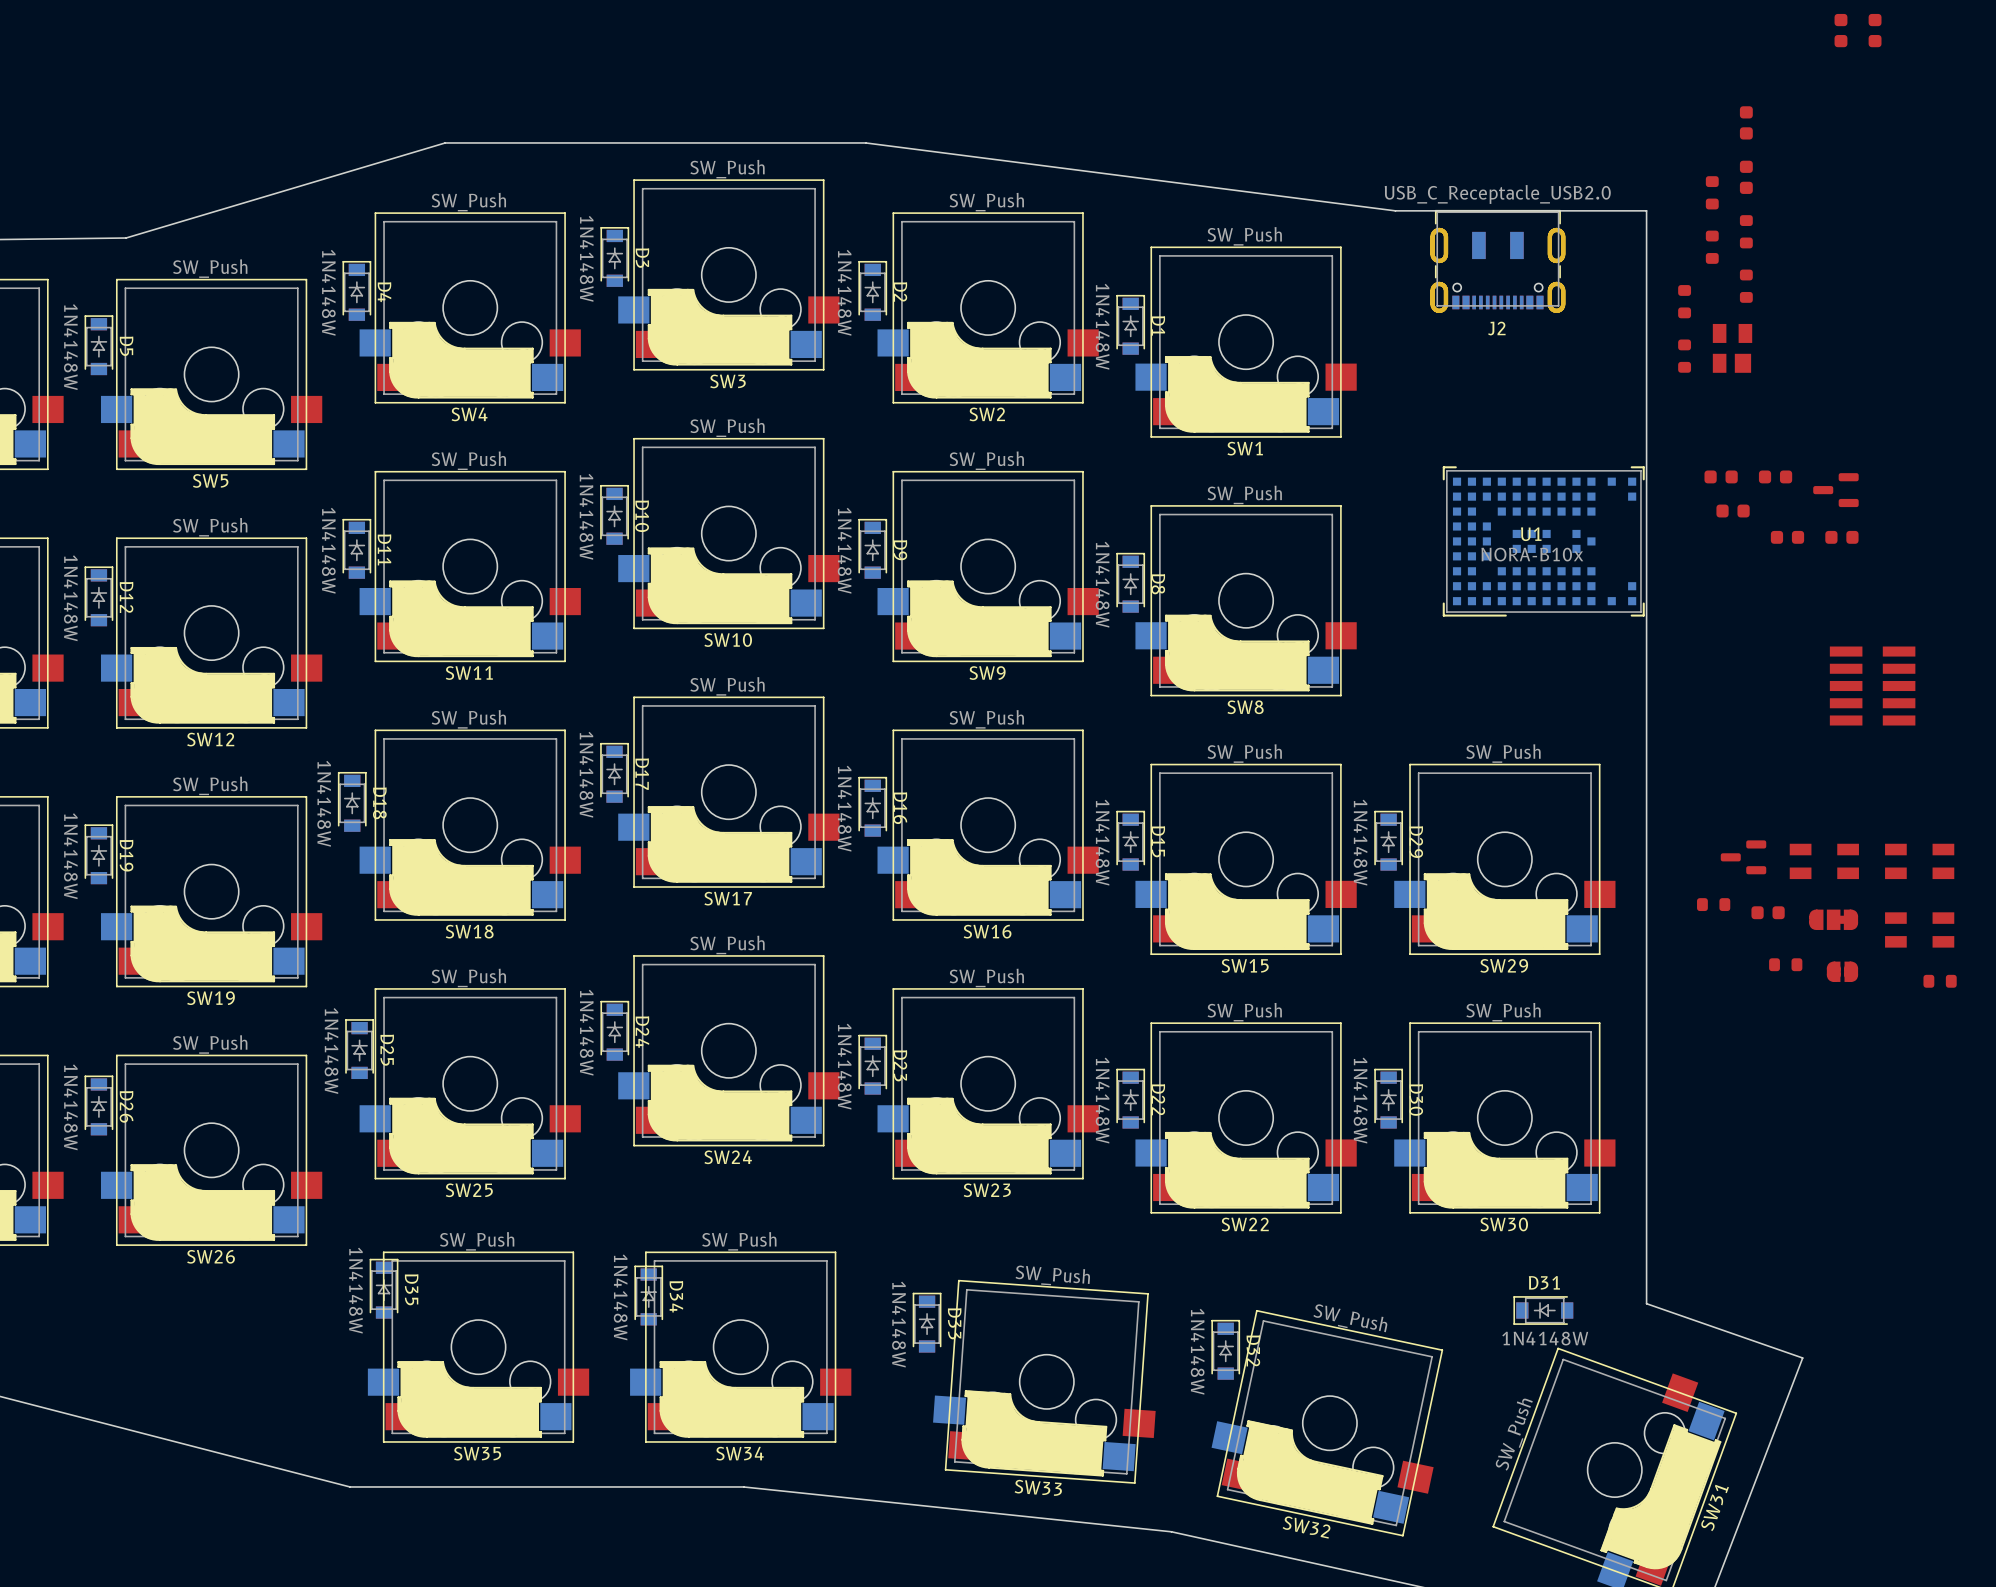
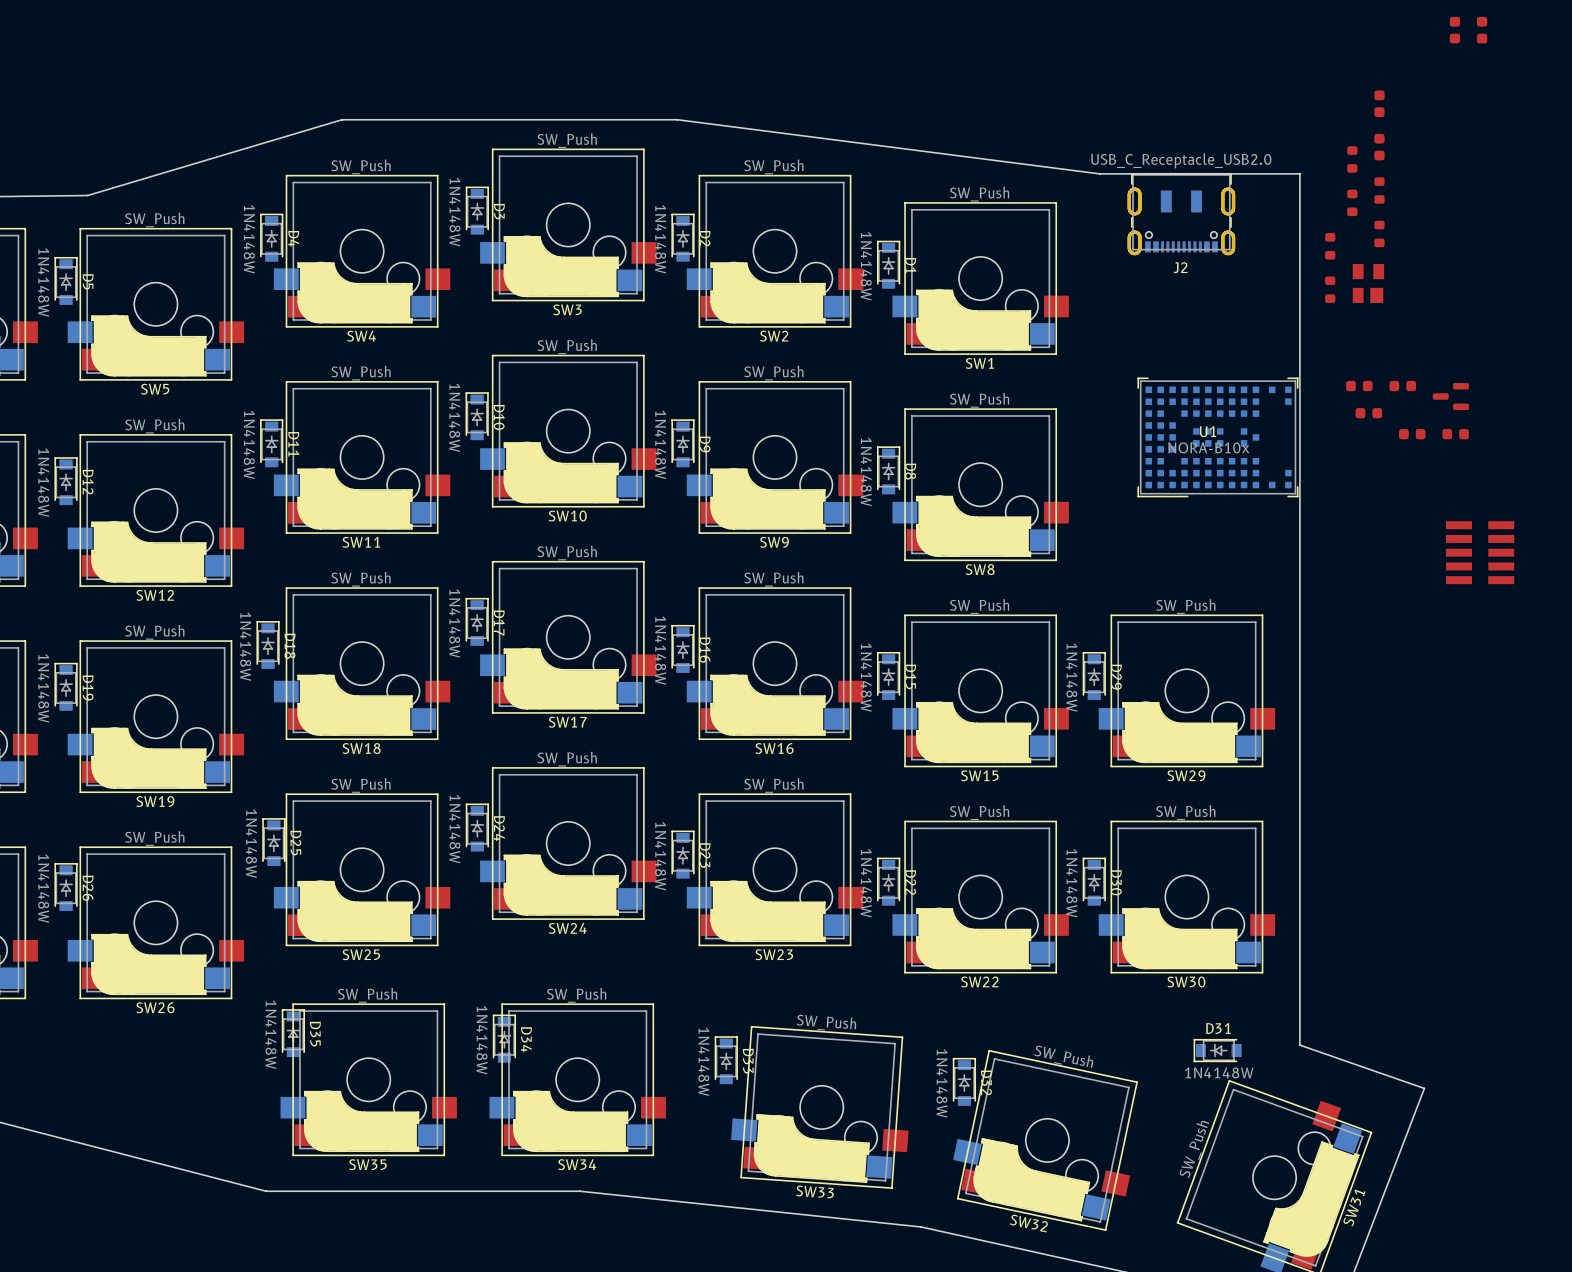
part: (1743, 857) -> none
part: (1824, 861) -> none
part: (1919, 861) -> none
part: (1713, 904) -> none
part: (1768, 912) -> none
part: (1833, 919) -> none
part: (1919, 929) -> none
part: (1785, 964) -> none
part: (1842, 971) -> none
part: (1940, 981) -> none

